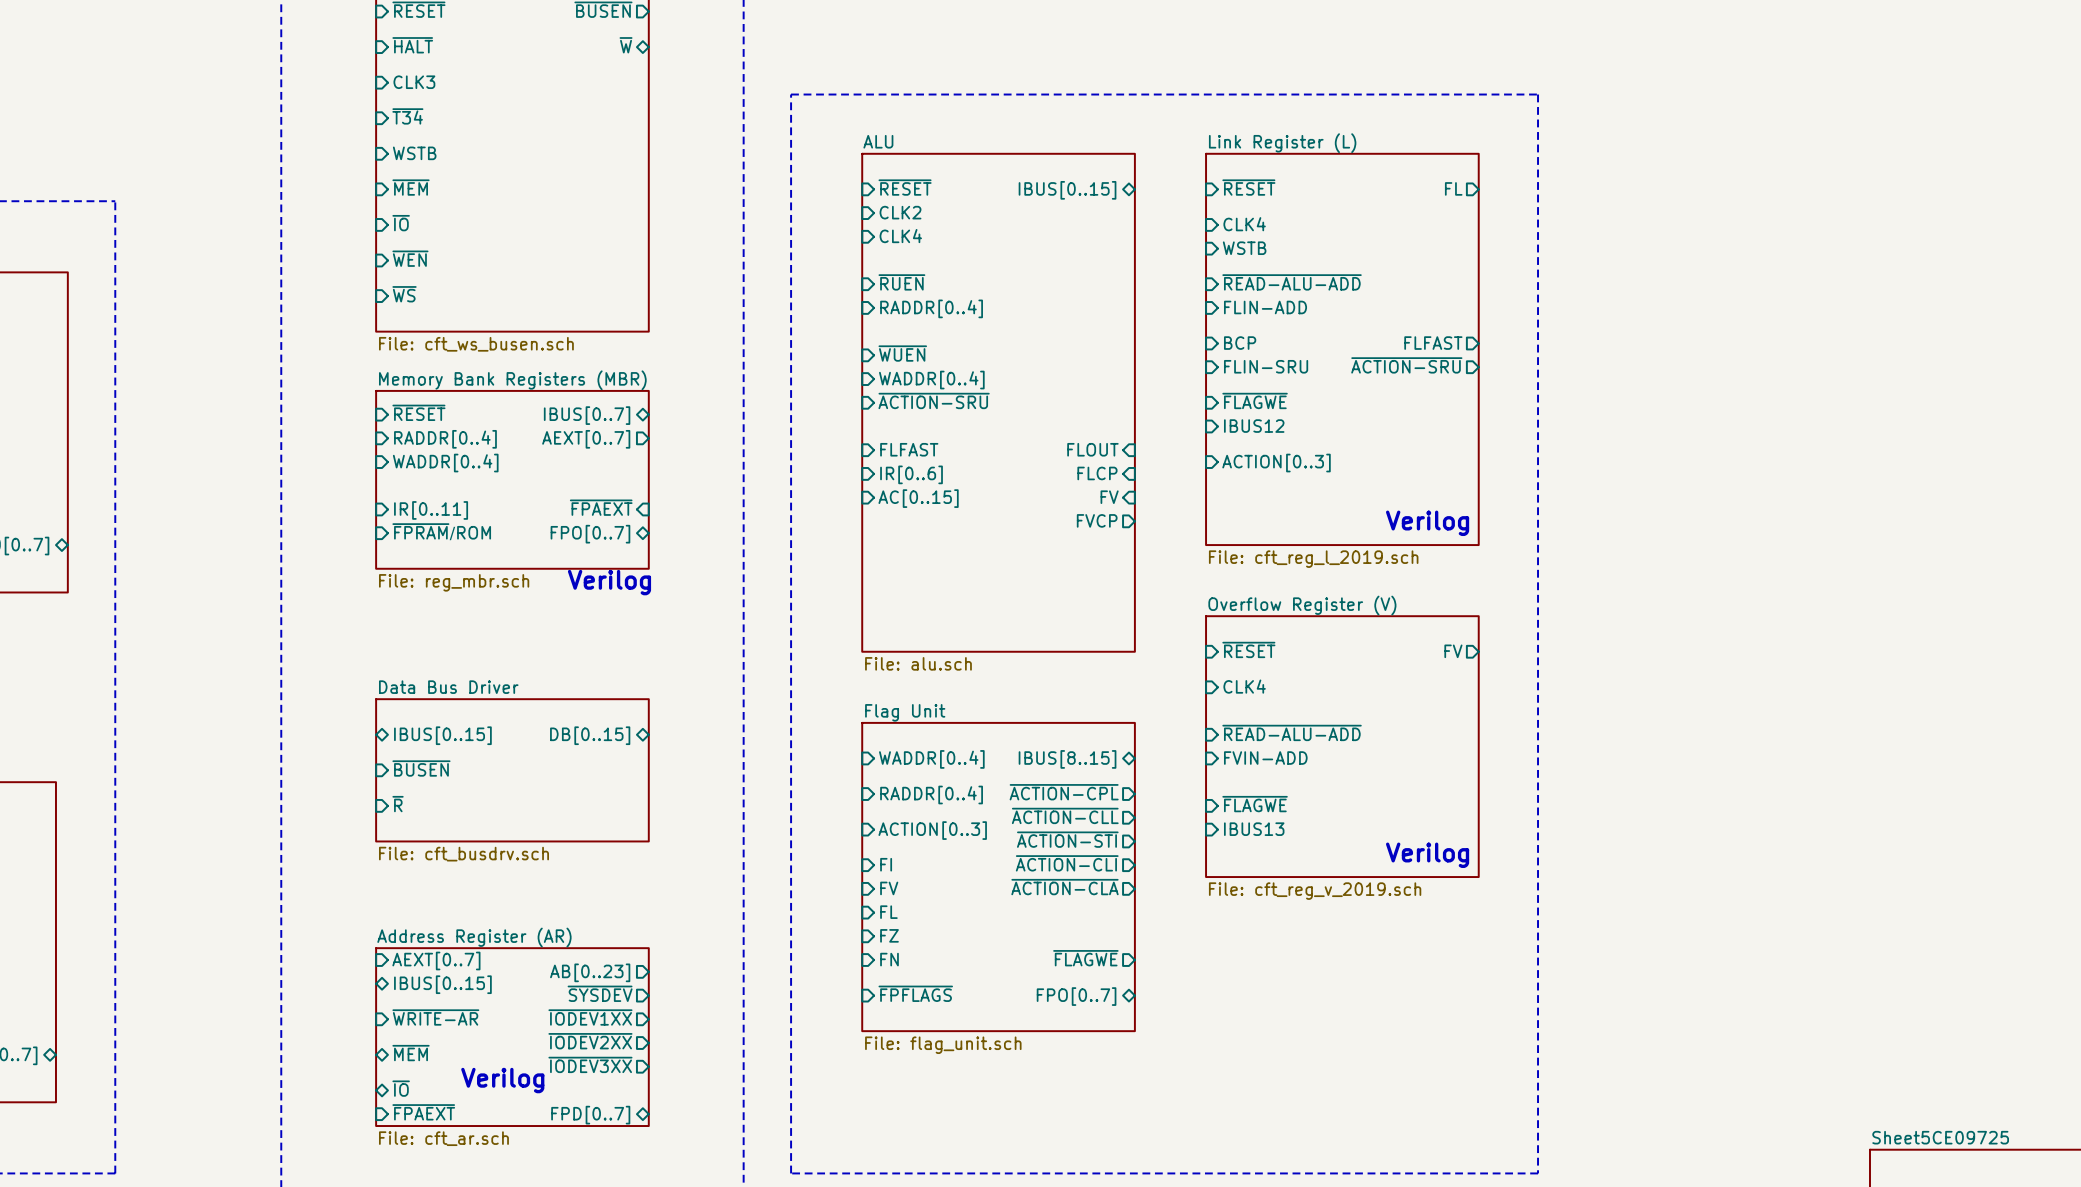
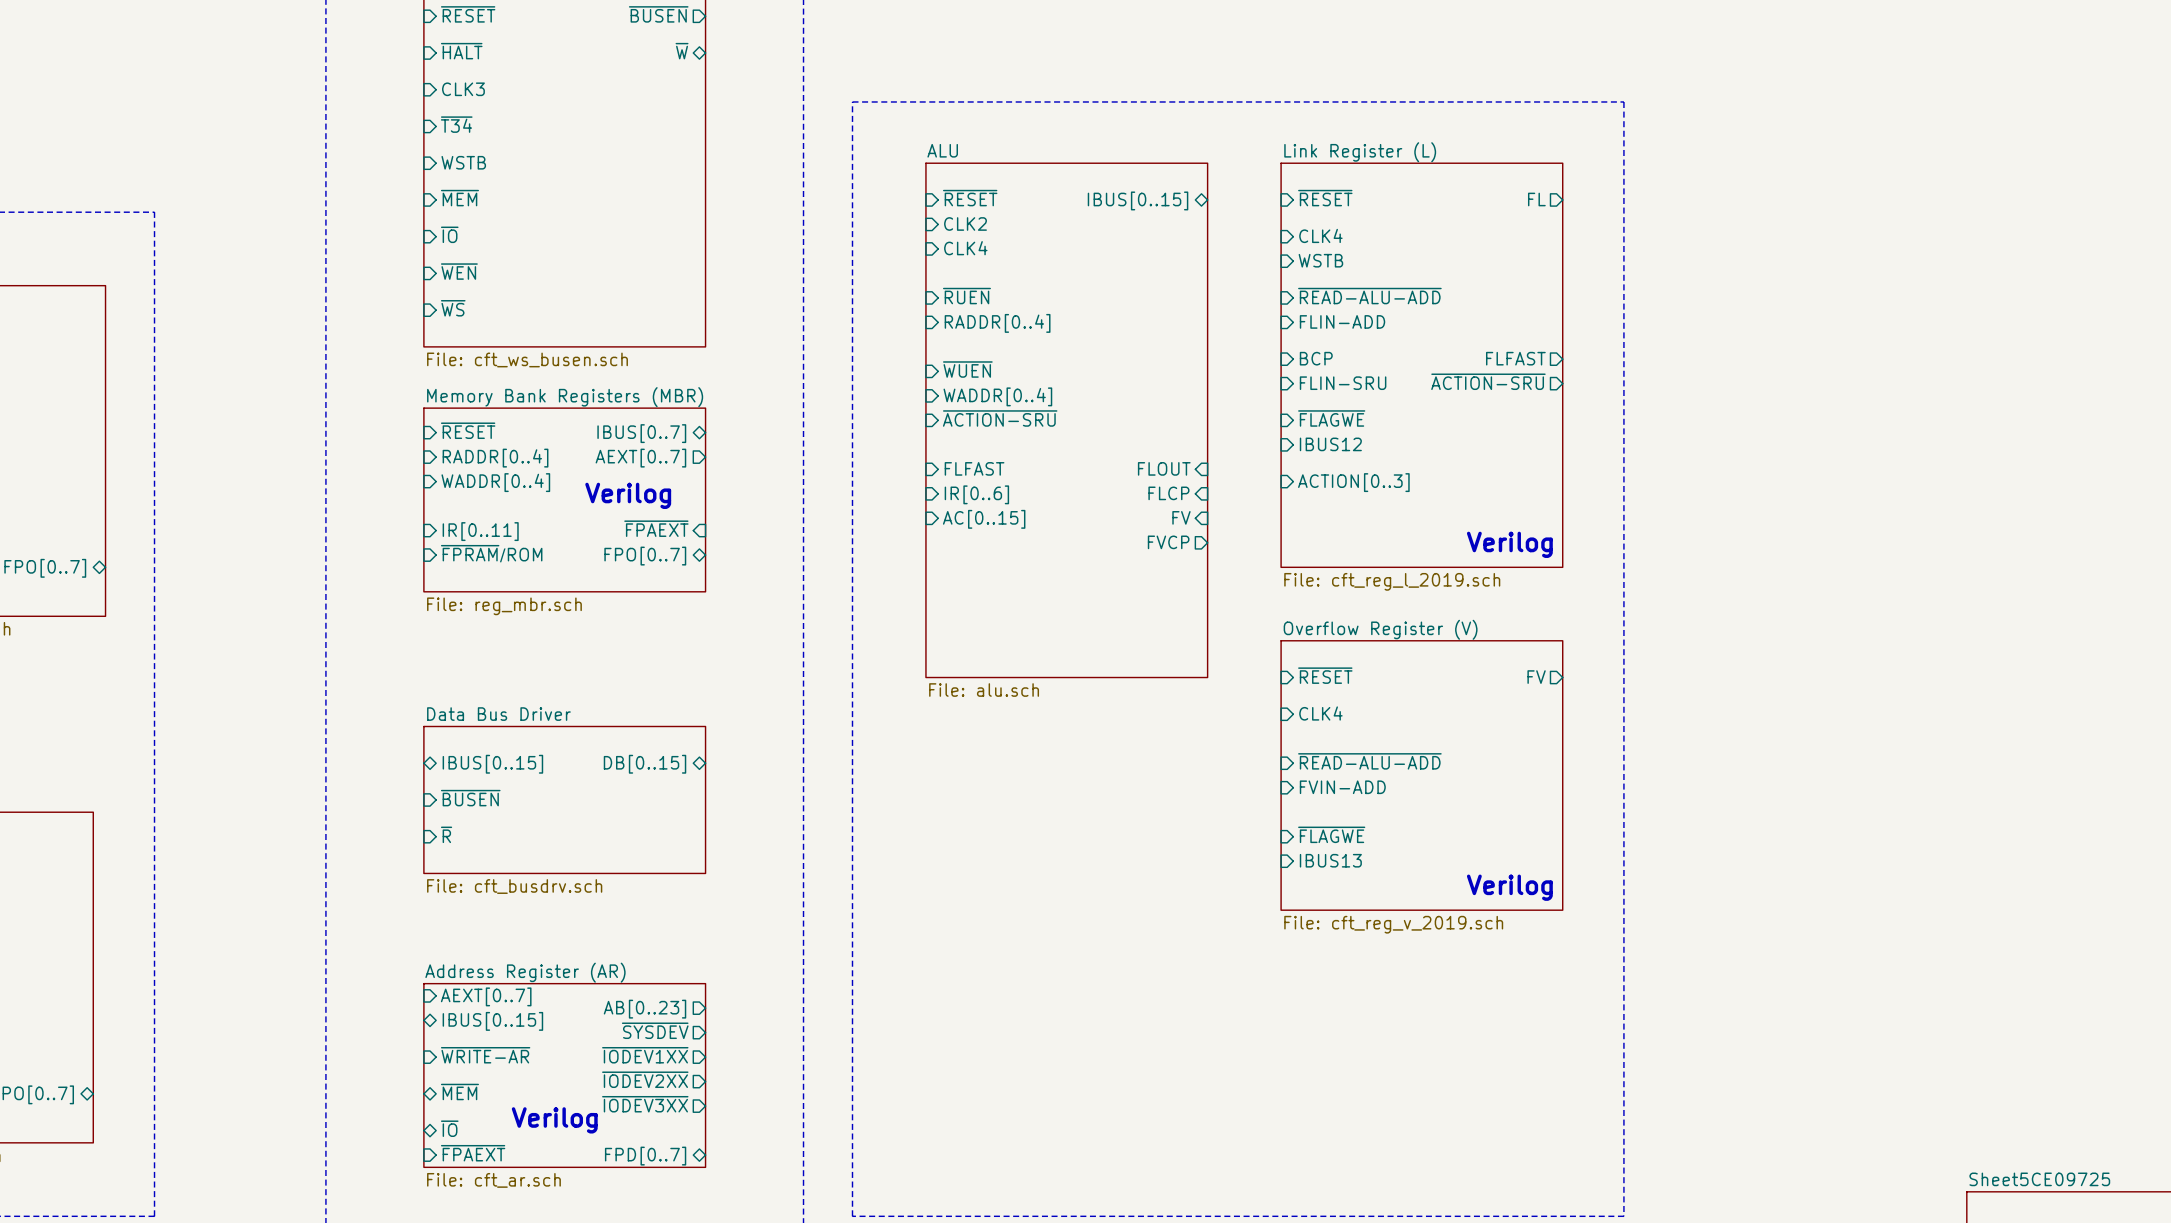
text position: Verilog (609, 582) -> Verilog (628, 495)
sheet pin: WADDR[0..4] (931, 759) -> none
sheet pin: IBUS[8..15] (1067, 759) -> none
sheet pin: ~{ACTION-CPL} (1064, 792) -> none
sheet pin: RADDR[0..4] (931, 795) -> none
sheet pin: ~{ACTION-CLL} (1065, 815) -> none
sheet pin: ACTION[0..3] (932, 830) -> none
sheet pin: ~{ACTION-STI} (1067, 839) -> none
sheet pin: ~{ACTION-CLI} (1067, 863) -> none
sheet pin: FI (886, 864) -> none
sheet Flag Unit: File: flag_unit.sch (998, 877) -> none
sheet pin: ~{ACTION-CLA} (1064, 887) -> none
sheet pin: FV (889, 888) -> none
sheet pin: FL (888, 912) -> none
sheet pin: FZ (889, 935) -> none
sheet pin: ~{FLAGWE} (1085, 958) -> none
sheet pin: FN (889, 959) -> none
sheet pin: ~{FPFLAGS} (915, 993) -> none
sheet pin: FPO[0..7] (1076, 996) -> none

